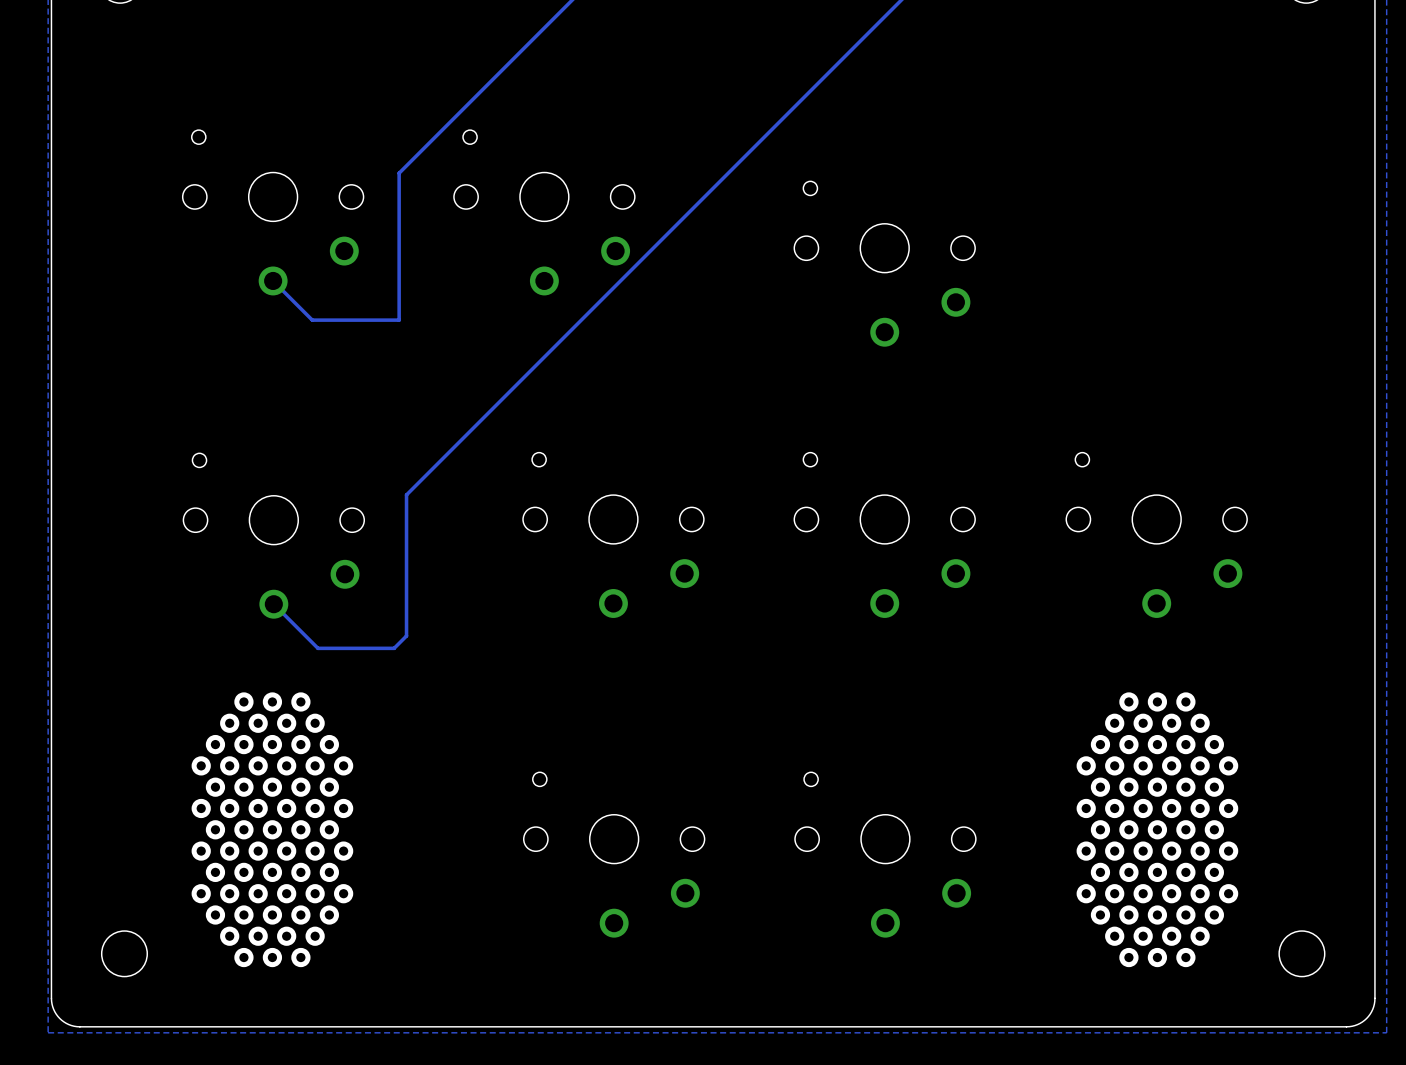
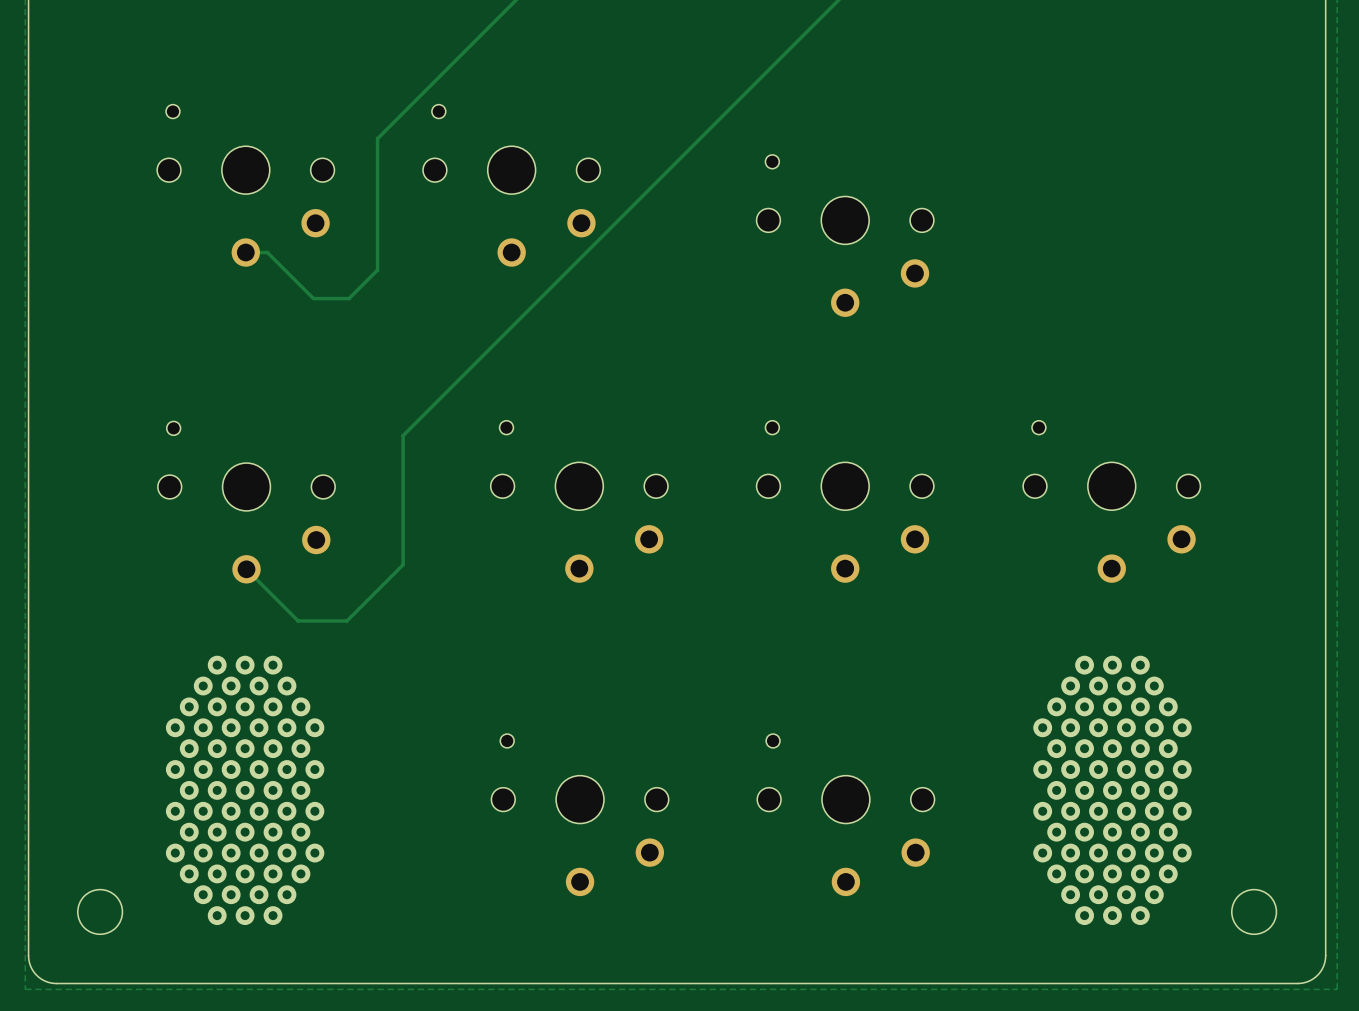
track: (407, 164) (399, 173) (399, 320) (312, 320) (273, 280) -> (377, 138) (377, 270) (349, 298) (313, 298) (267, 252) (245, 252)
track: (433, 467) (406, 494) (406, 635) (394, 648) (317, 648) -> (403, 435) (403, 564) (346, 620) (298, 620) (289, 612)

